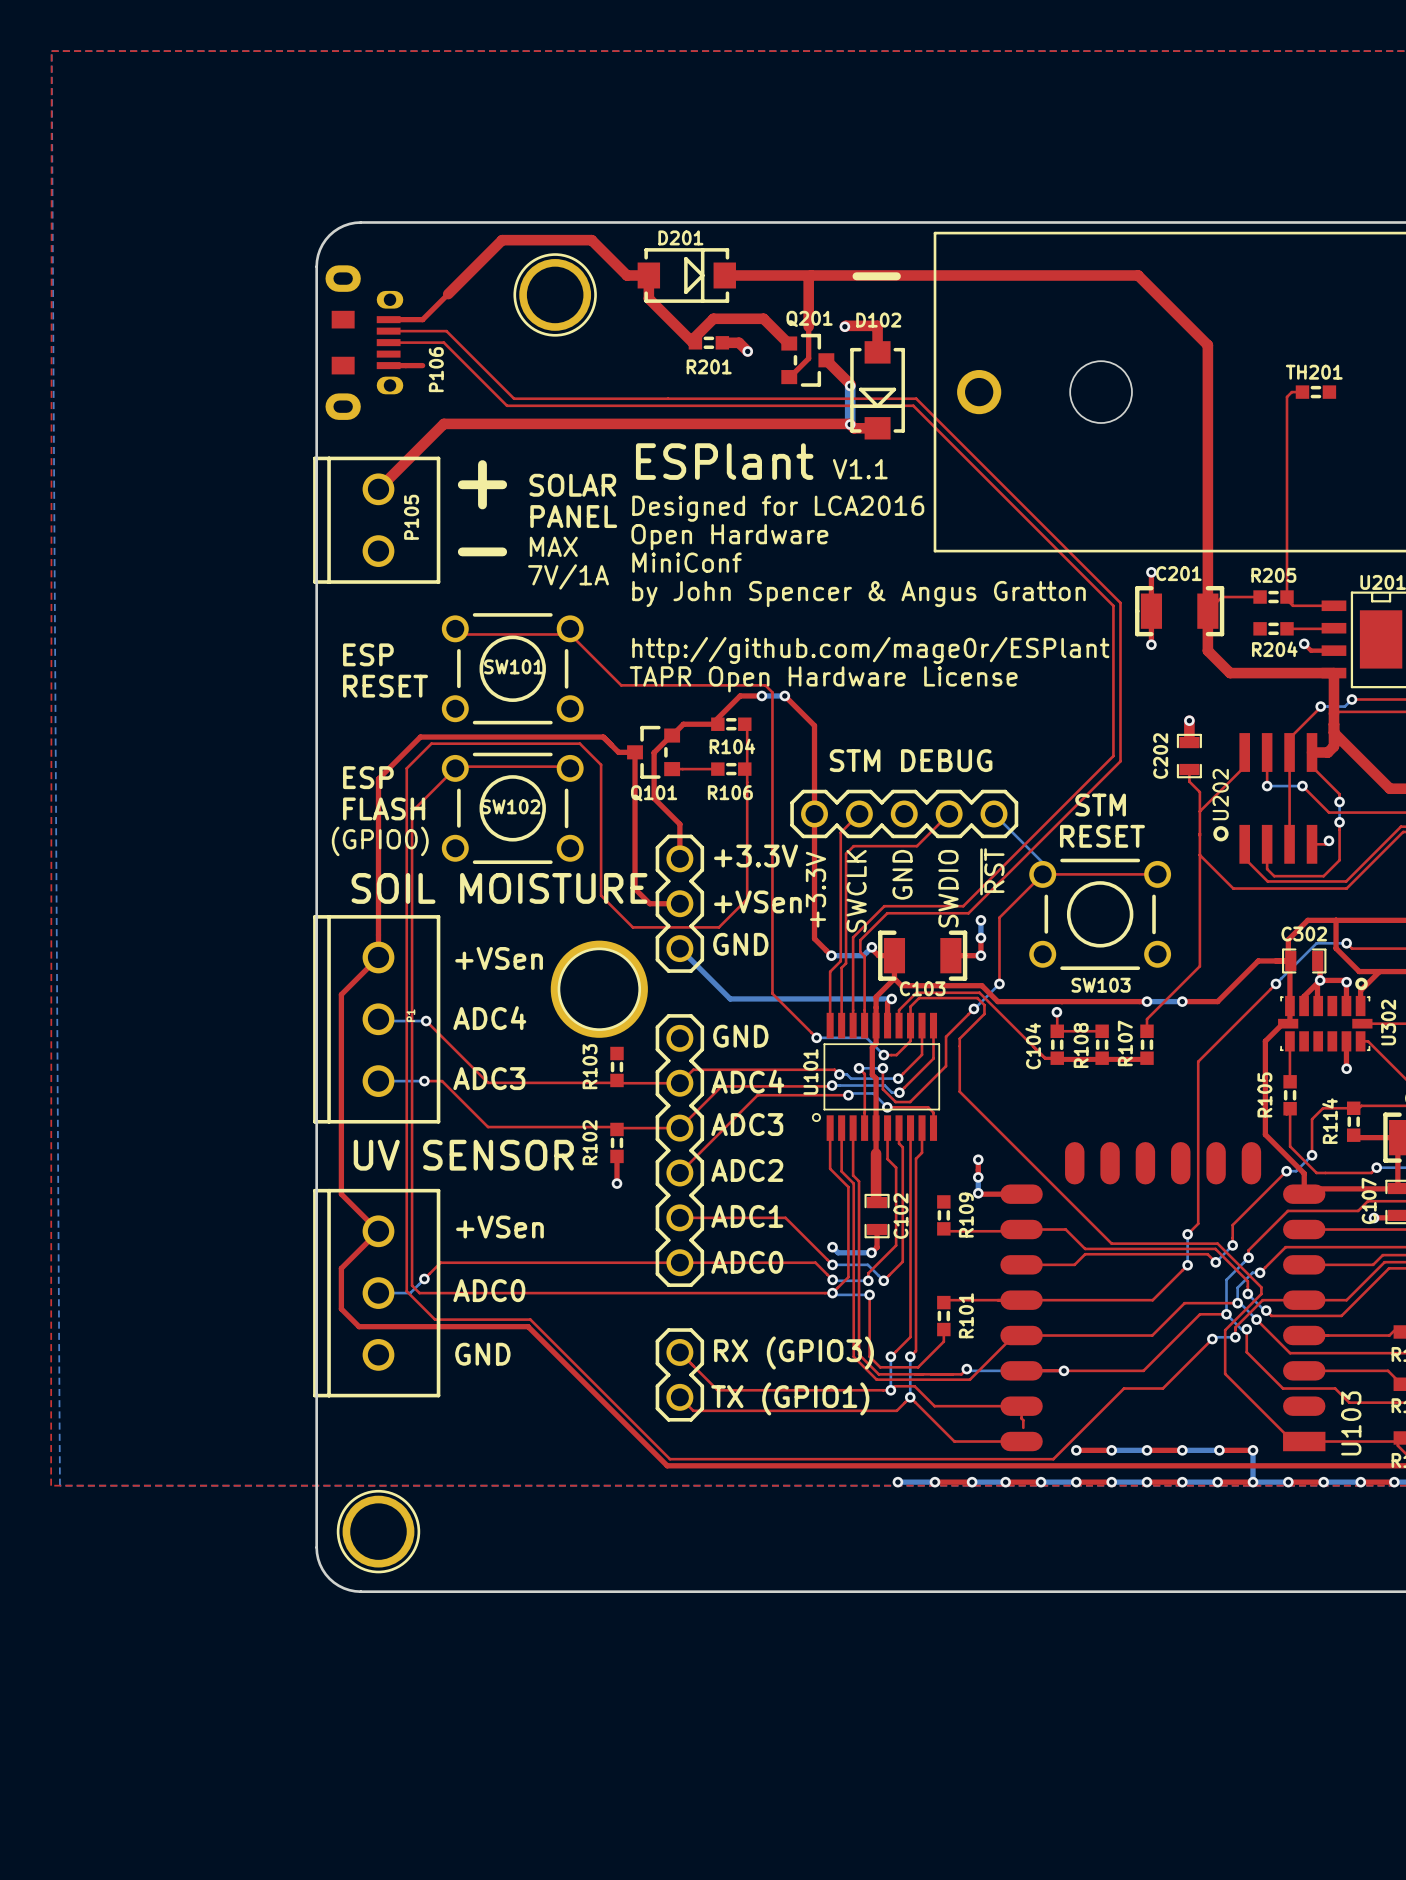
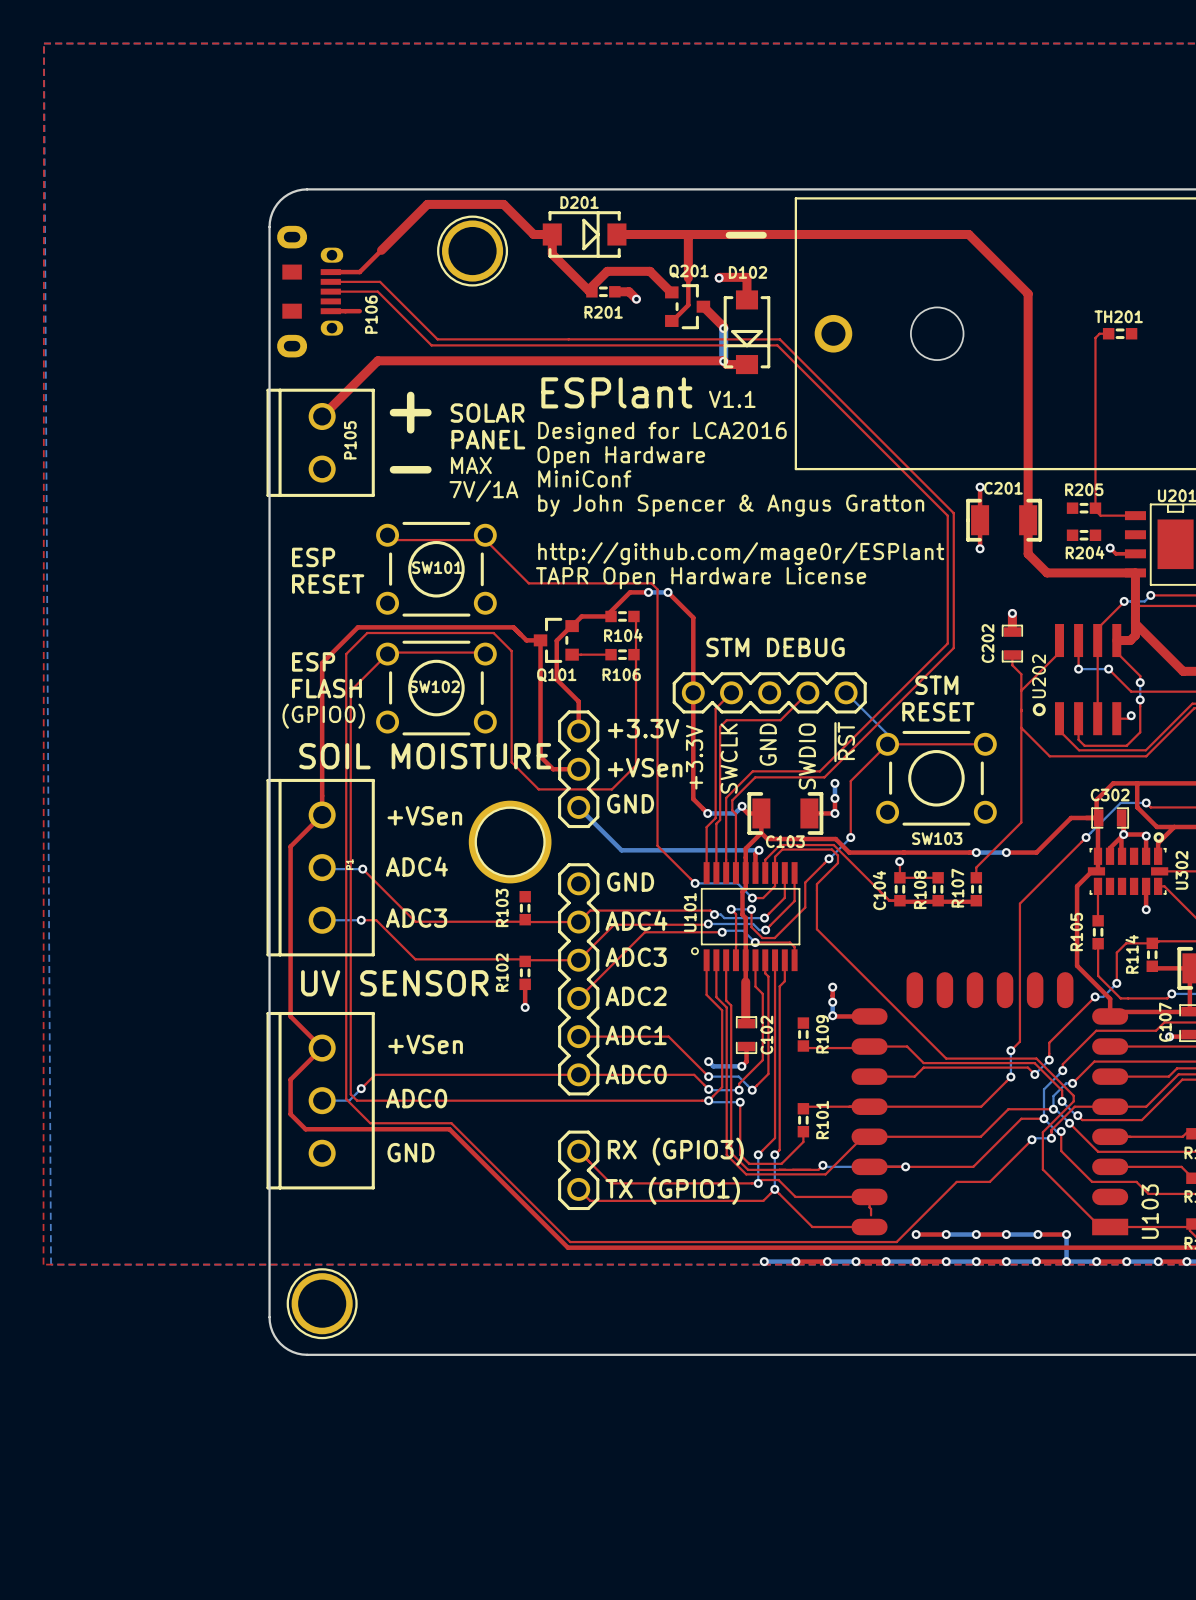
top track: (1260, 597) (1222, 597) (1207, 611) -> none
top track: (1333, 628) (1287, 628) -> none

